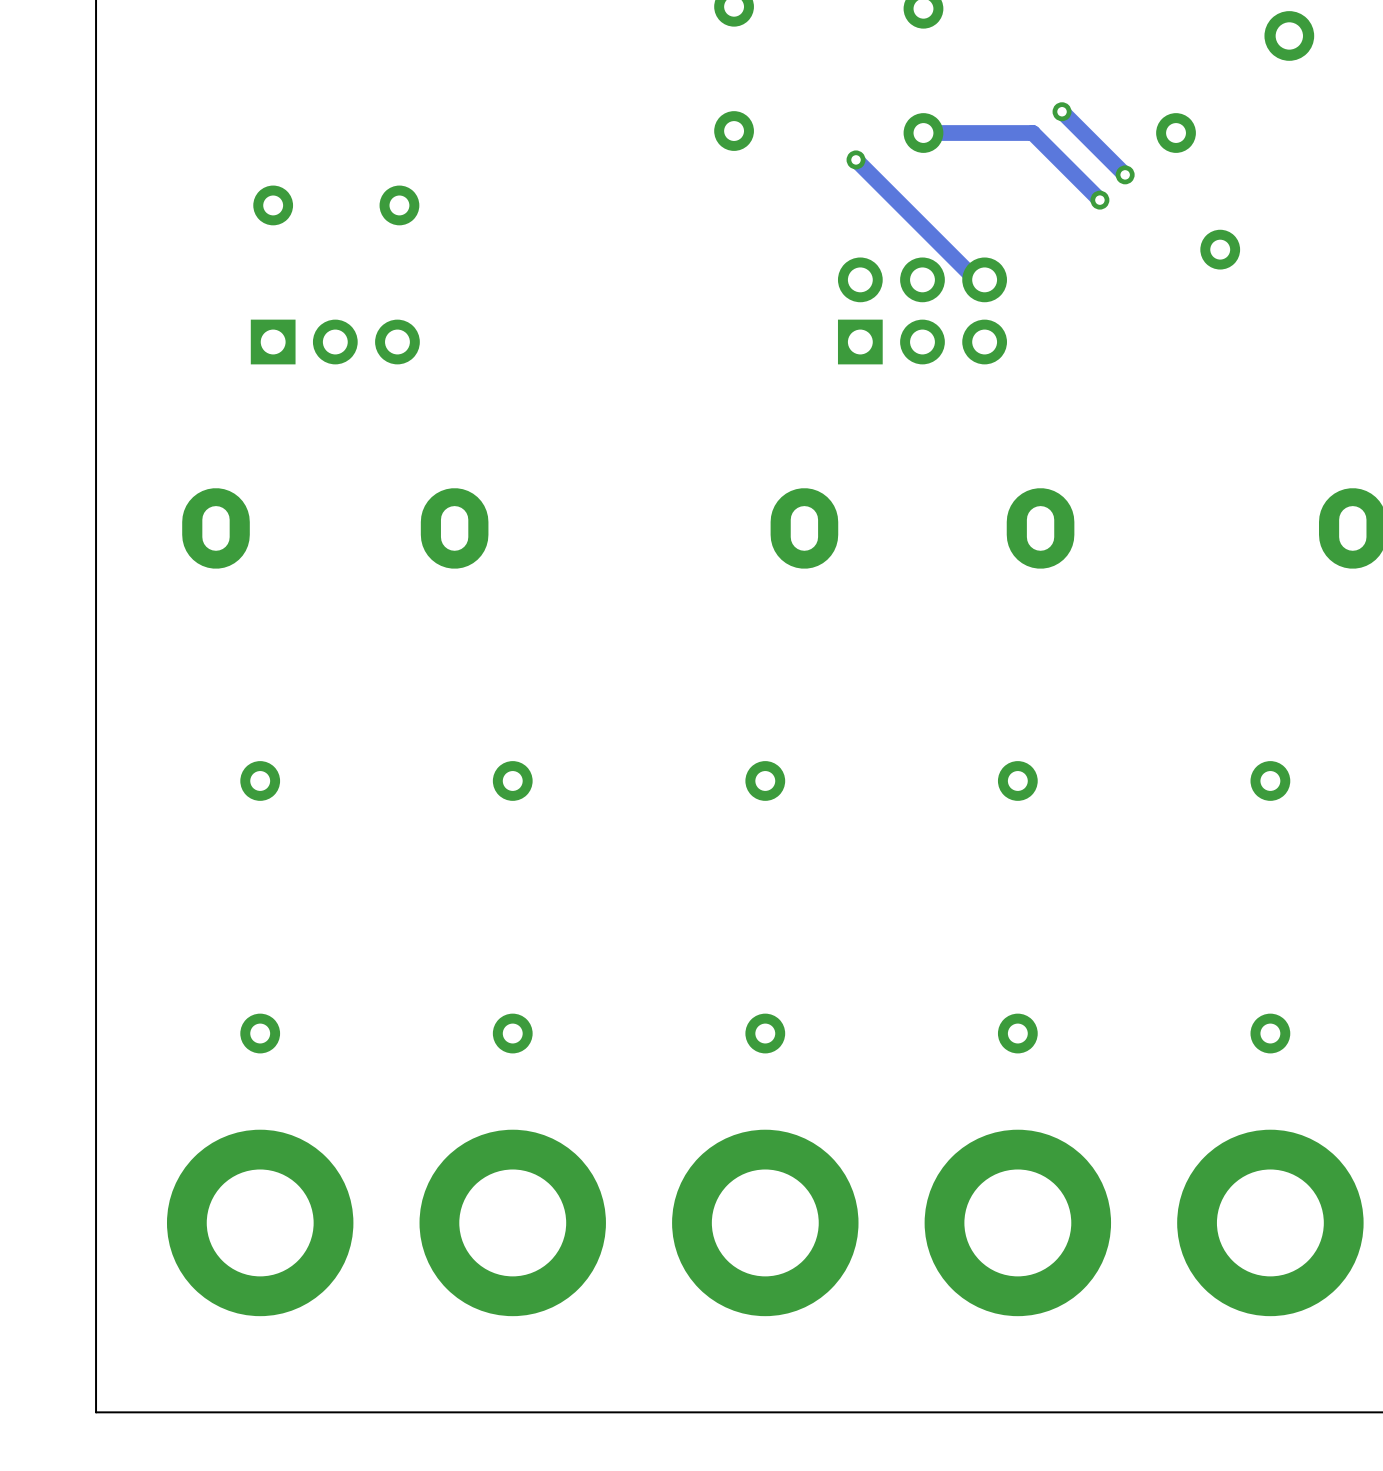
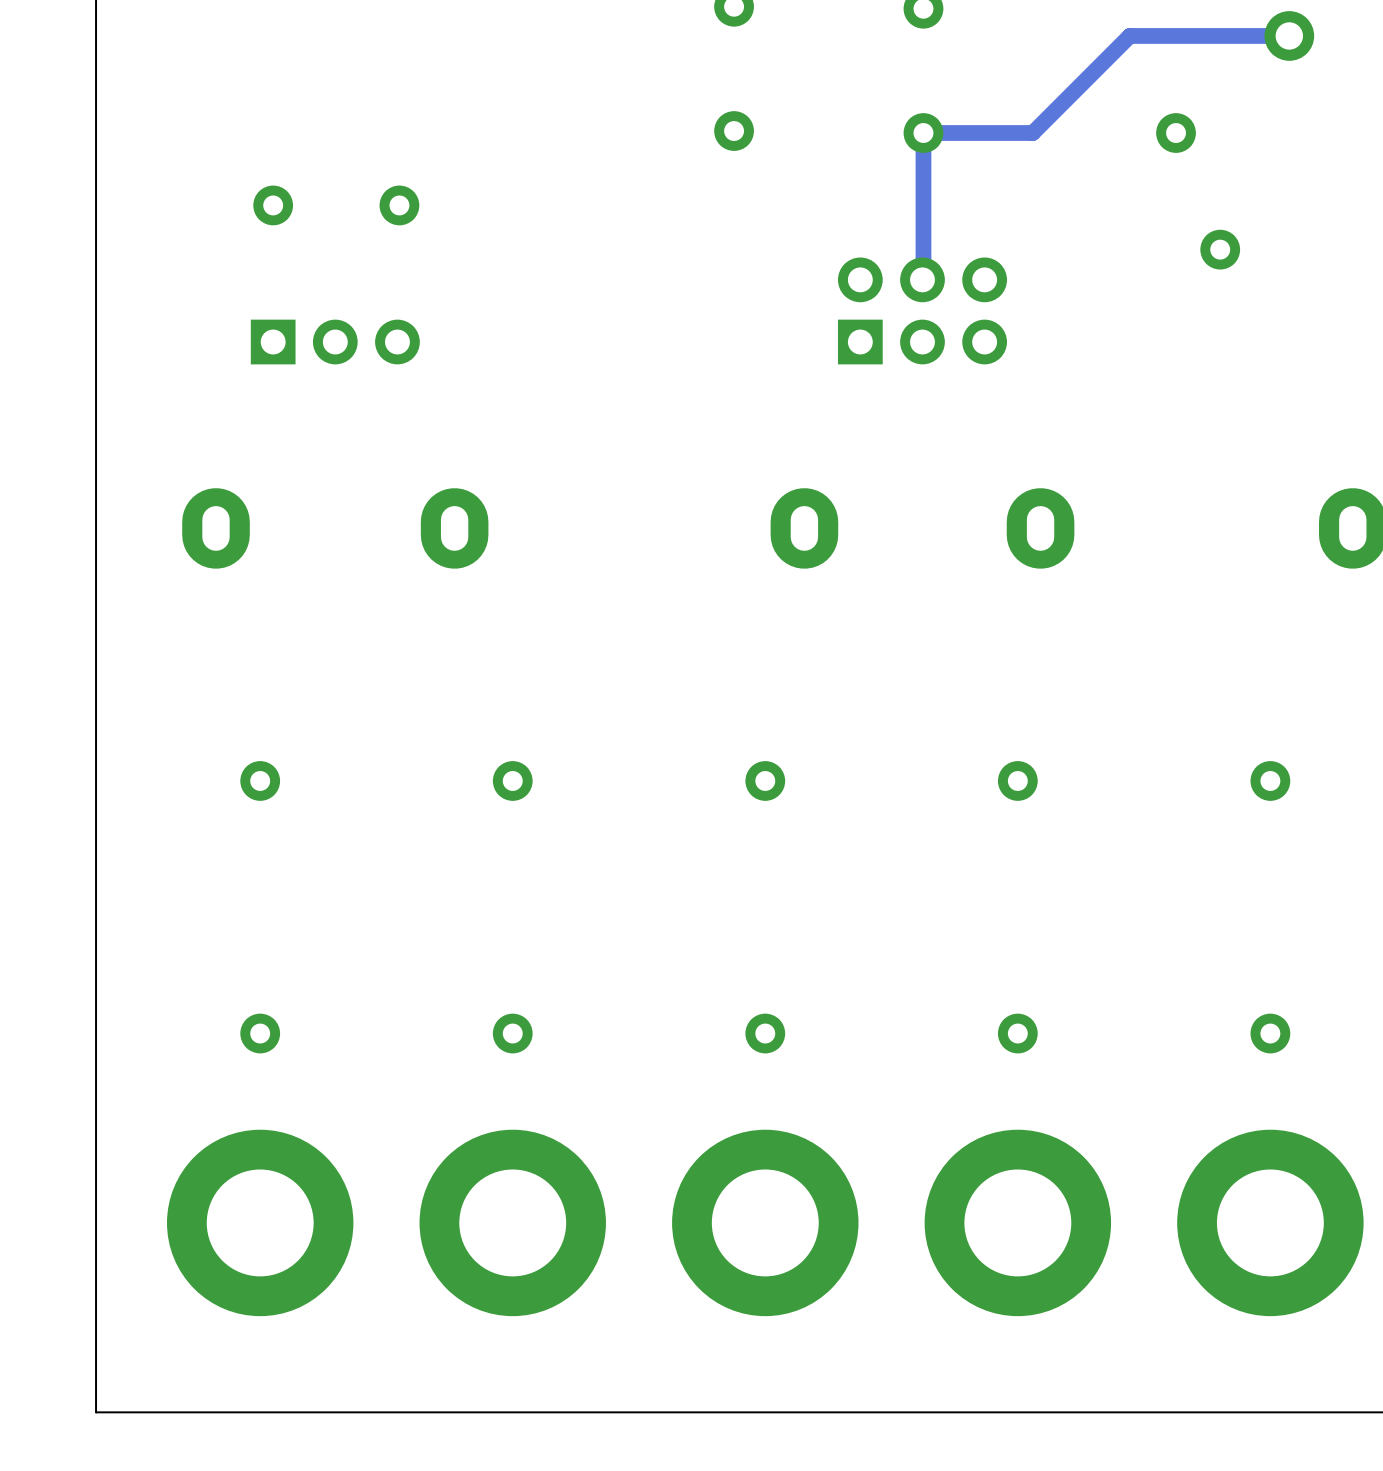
track: (1062, 111) (1125, 174) -> none
via: (1062, 111) -> none
track: none -> (923, 133) (923, 278)
track: (1032, 133) (1099, 200) -> (1032, 133) (1129, 35) (1289, 35)
track: (856, 159) (984, 288) (984, 286) -> none
via: (856, 159) -> none
via: (1125, 174) -> none
via: (1099, 200) -> none

